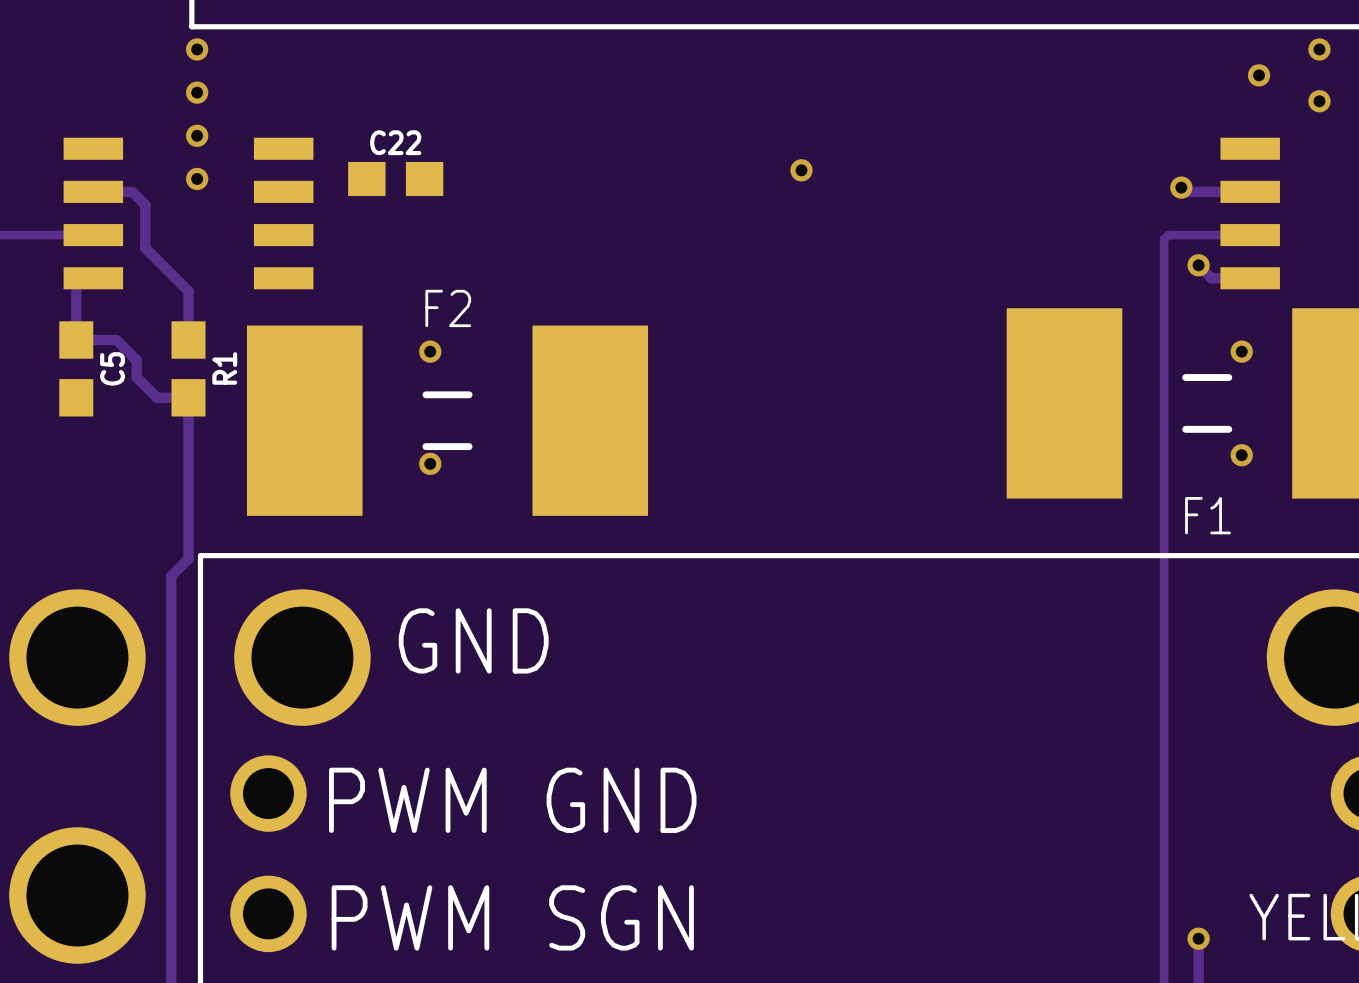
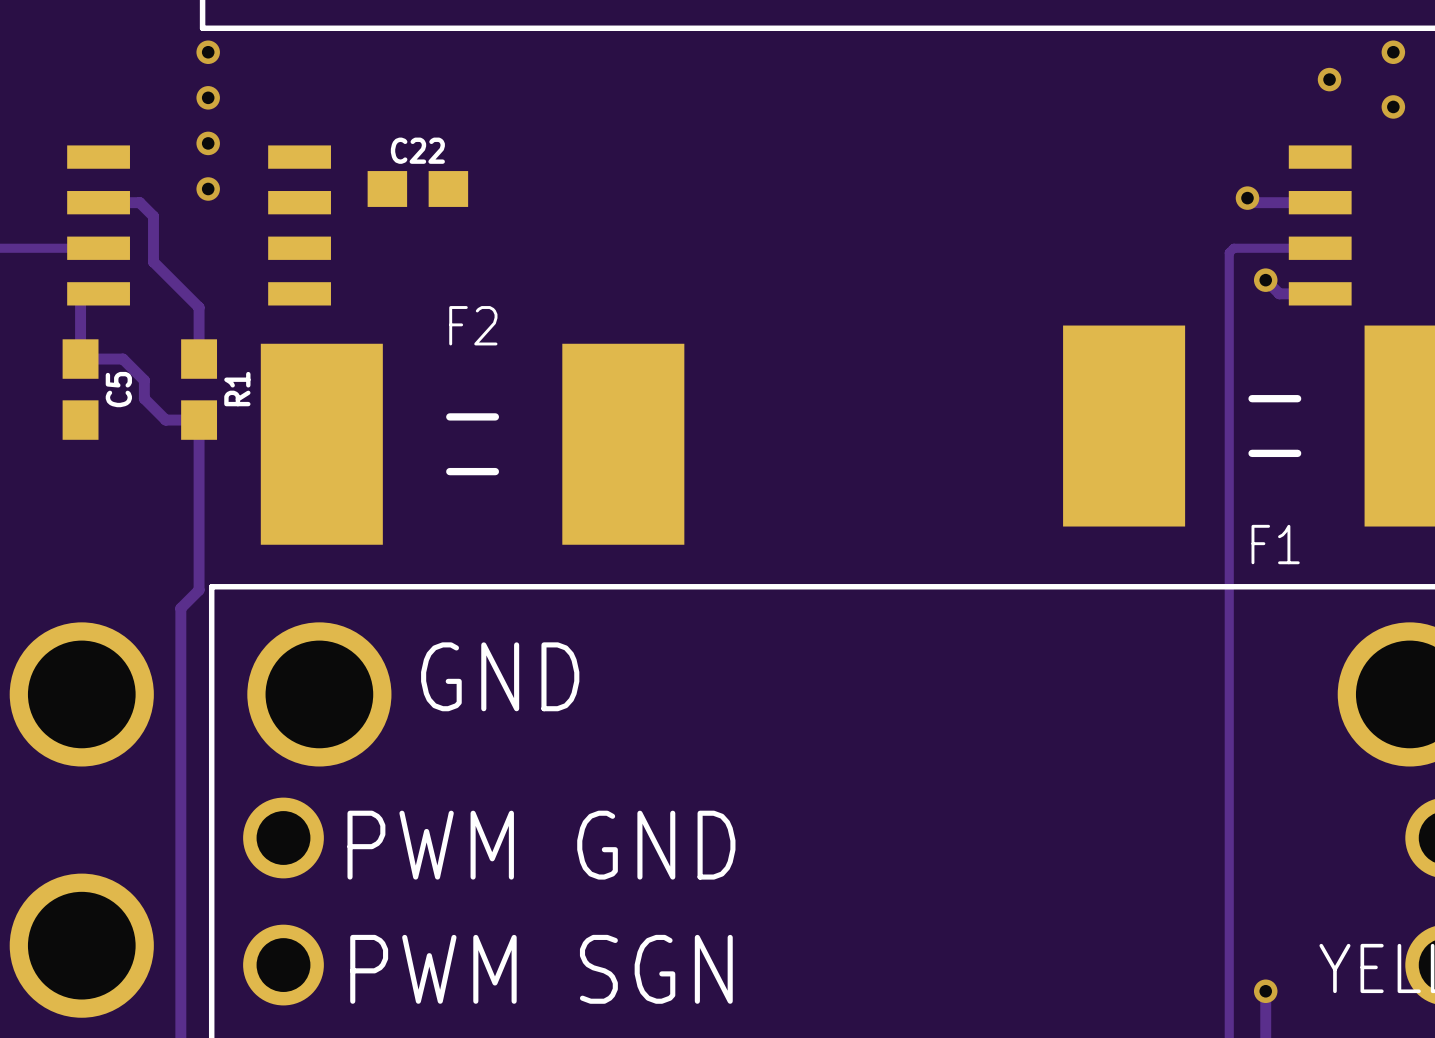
via: (801, 170) -> none
via: (430, 351) -> none
via: (1241, 351) -> none
via: (1241, 455) -> none
via: (430, 463) -> none

